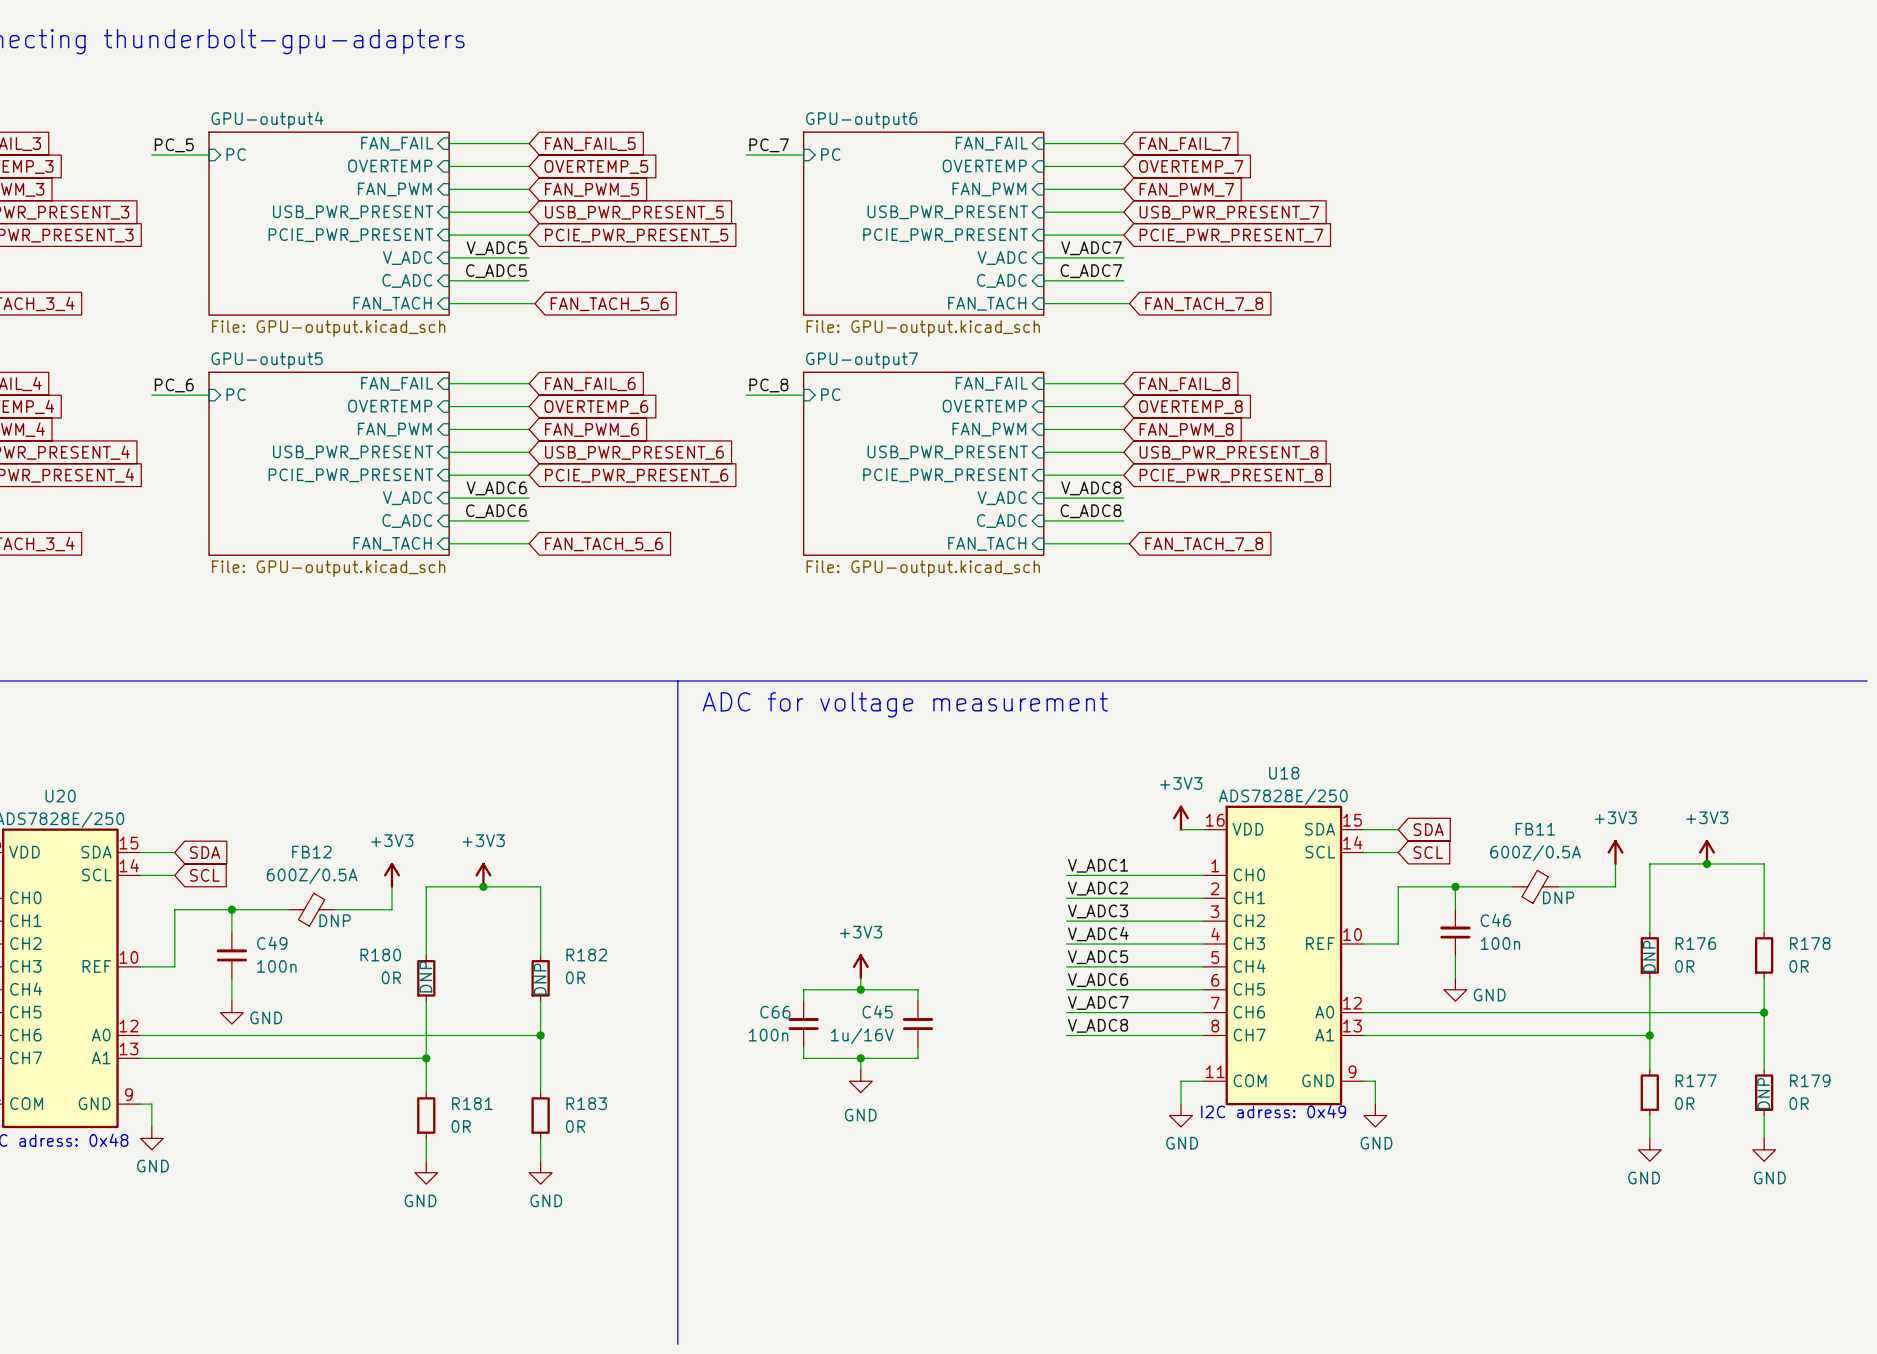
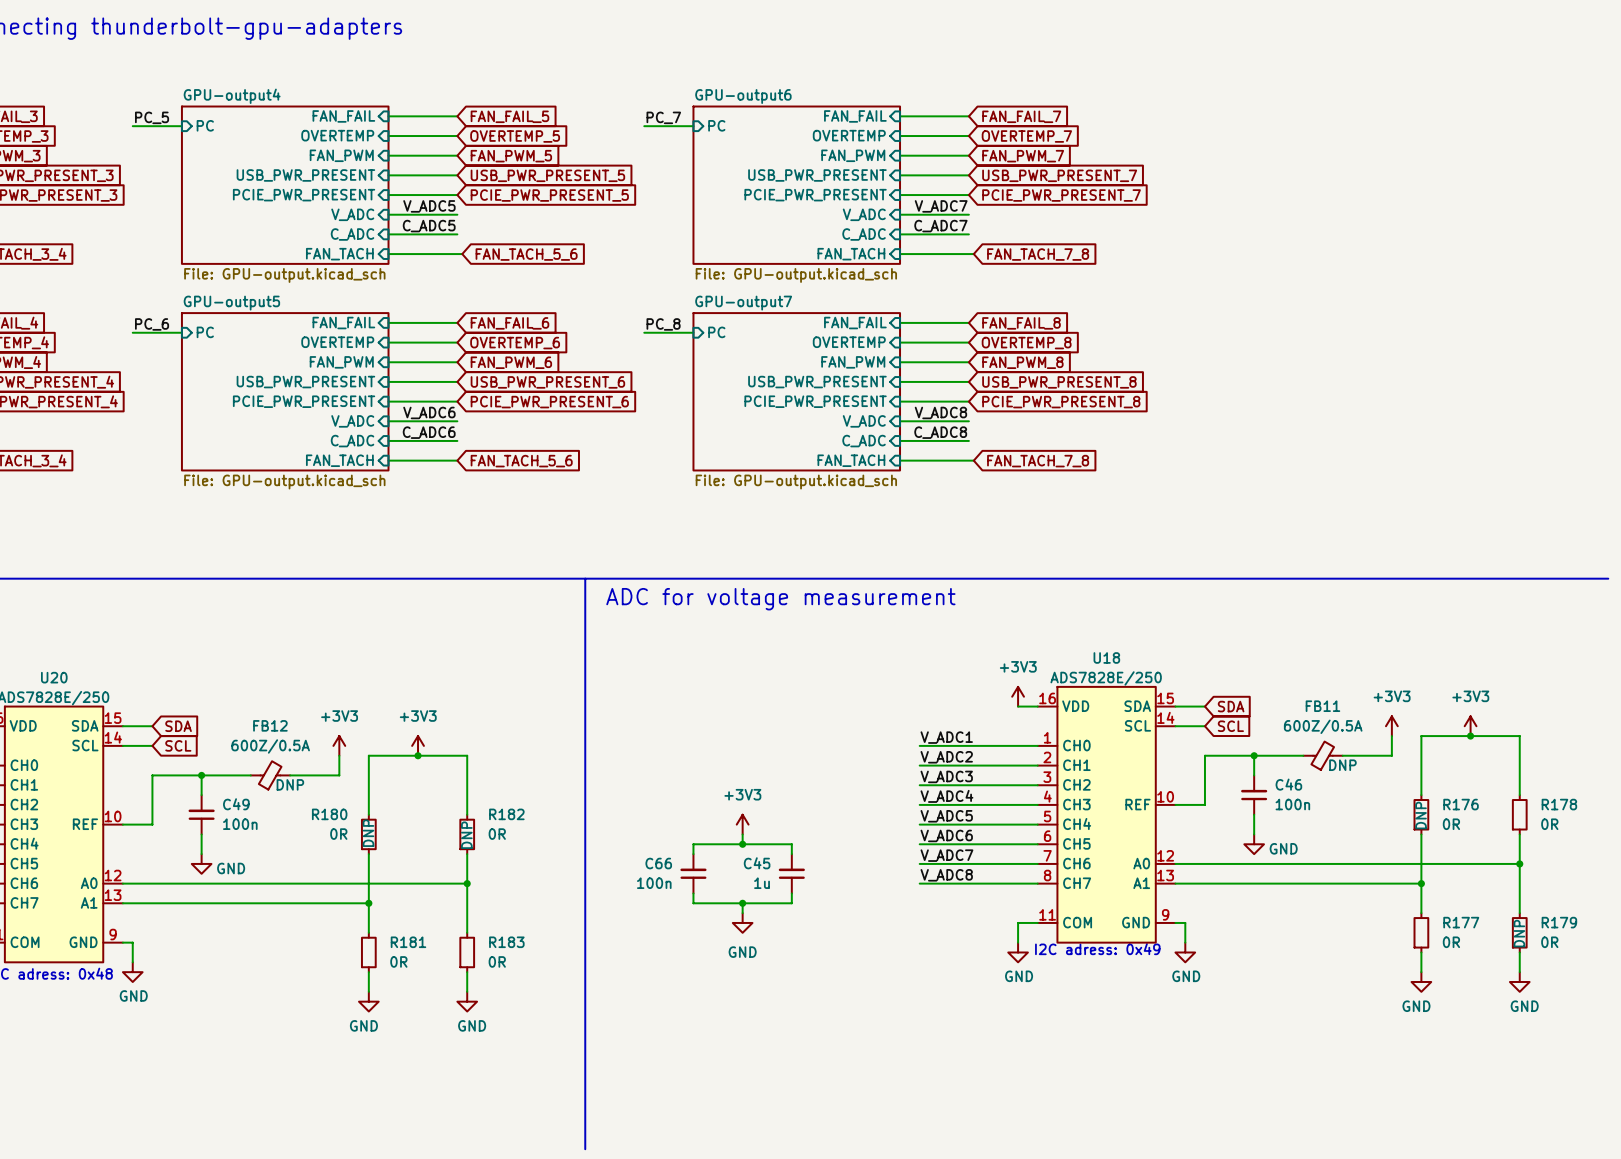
C66 name position: C66 (775, 1012) -> C66 (658, 863)
C66 text position: 100n (768, 1035) -> 100n (654, 883)
C45 text: 1u/16V (862, 1036) -> 1u (762, 883)

